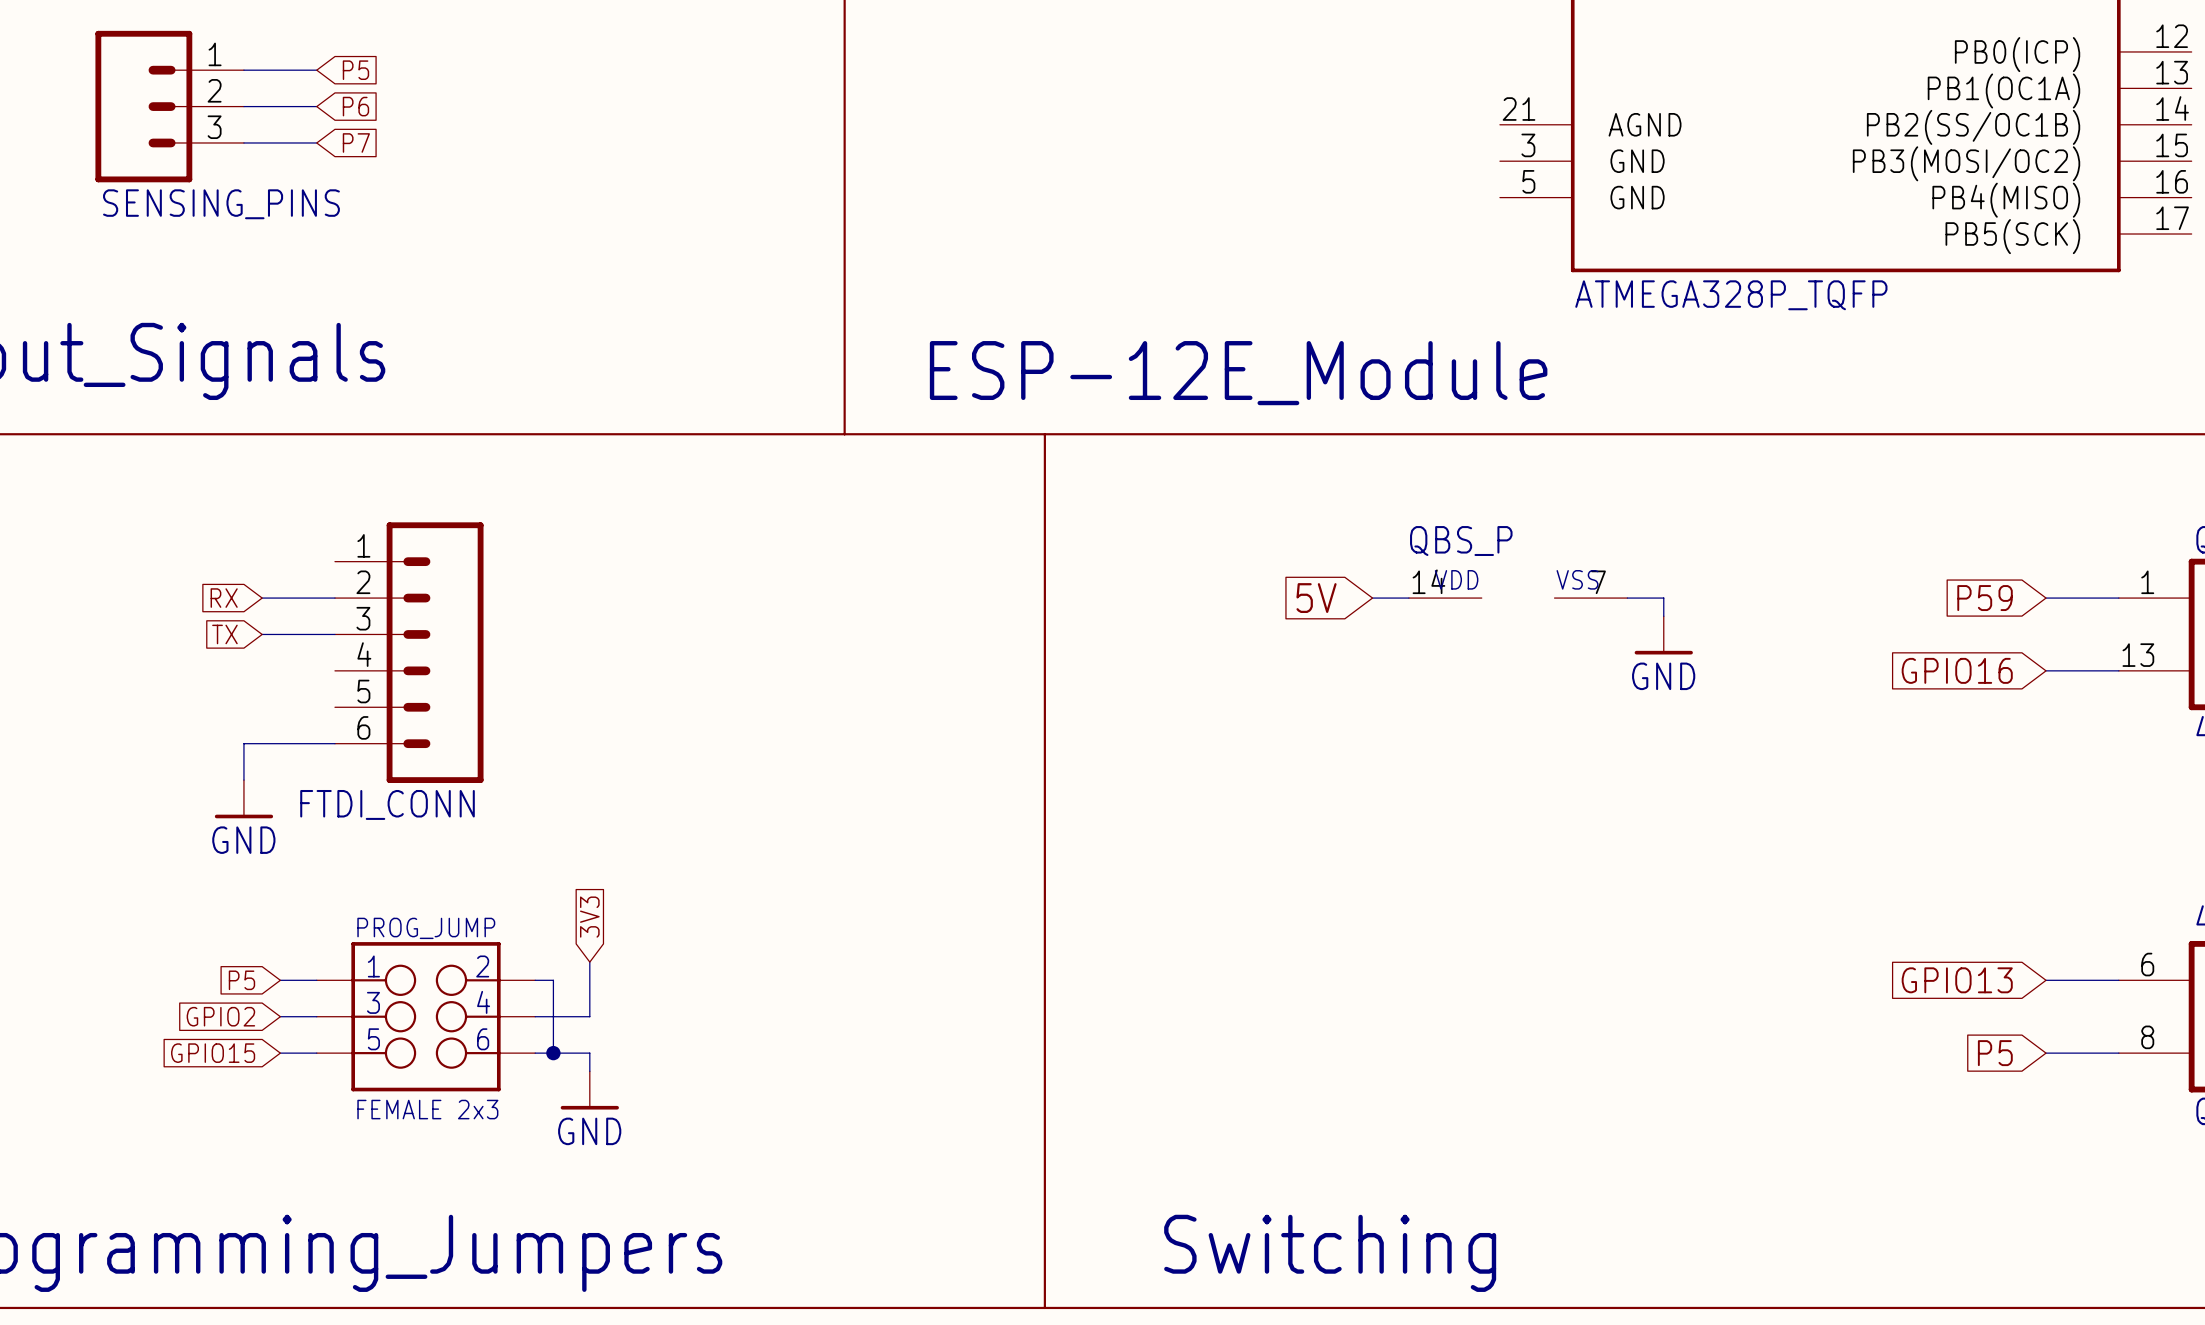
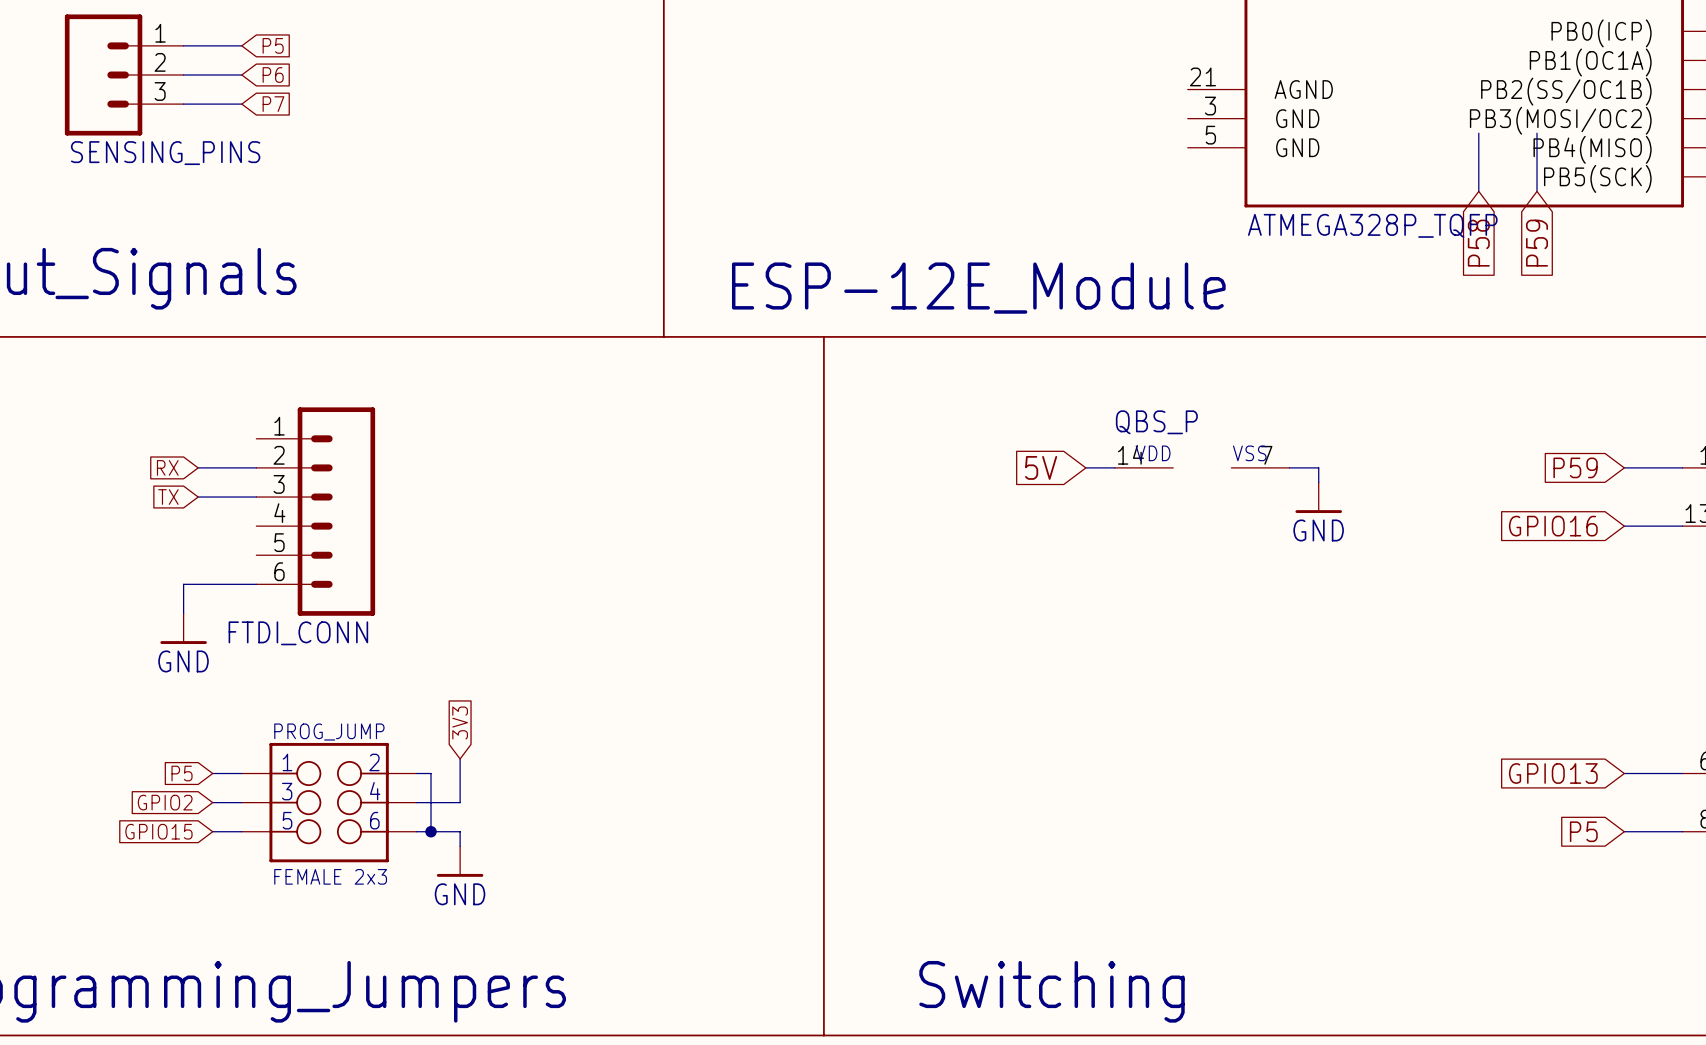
wire: none -> (1478, 133) (1478, 191)
wire: none -> (1537, 133) (1537, 191)
global label: none -> P58 (1478, 243)
global label: none -> P59 (1537, 243)

